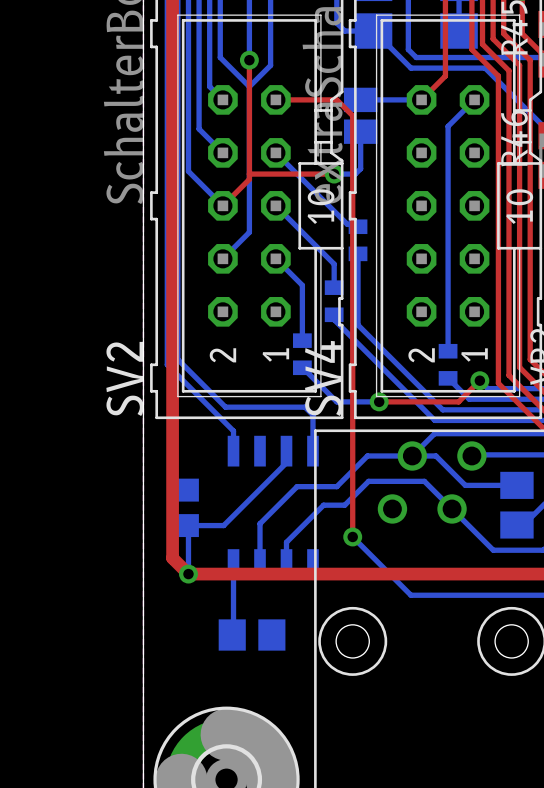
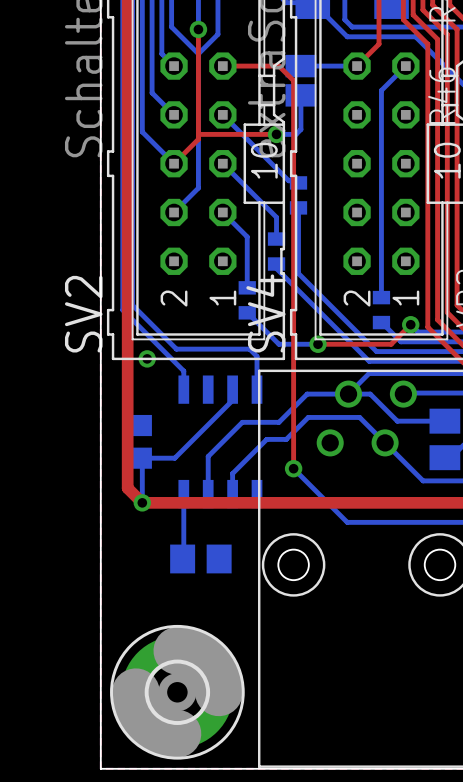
via: none -> (147, 358)

